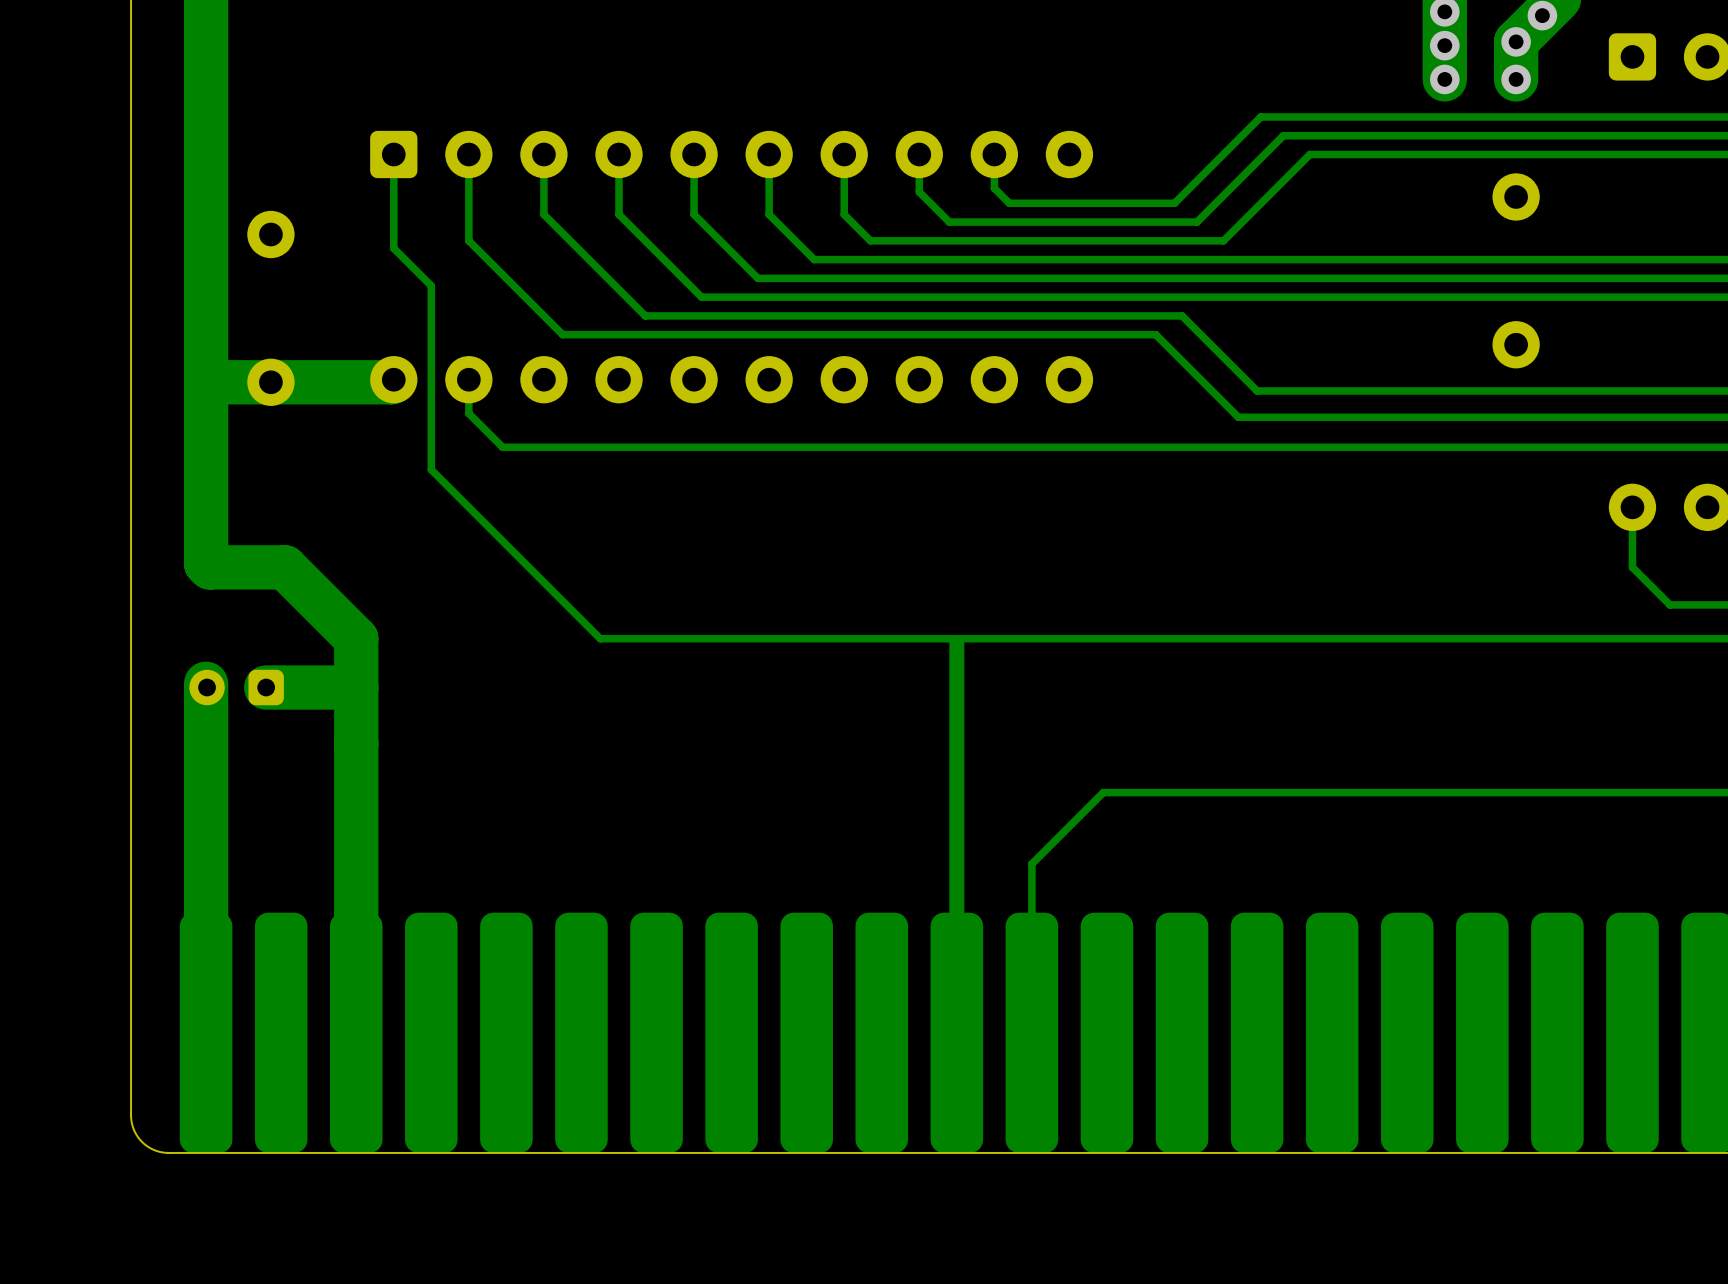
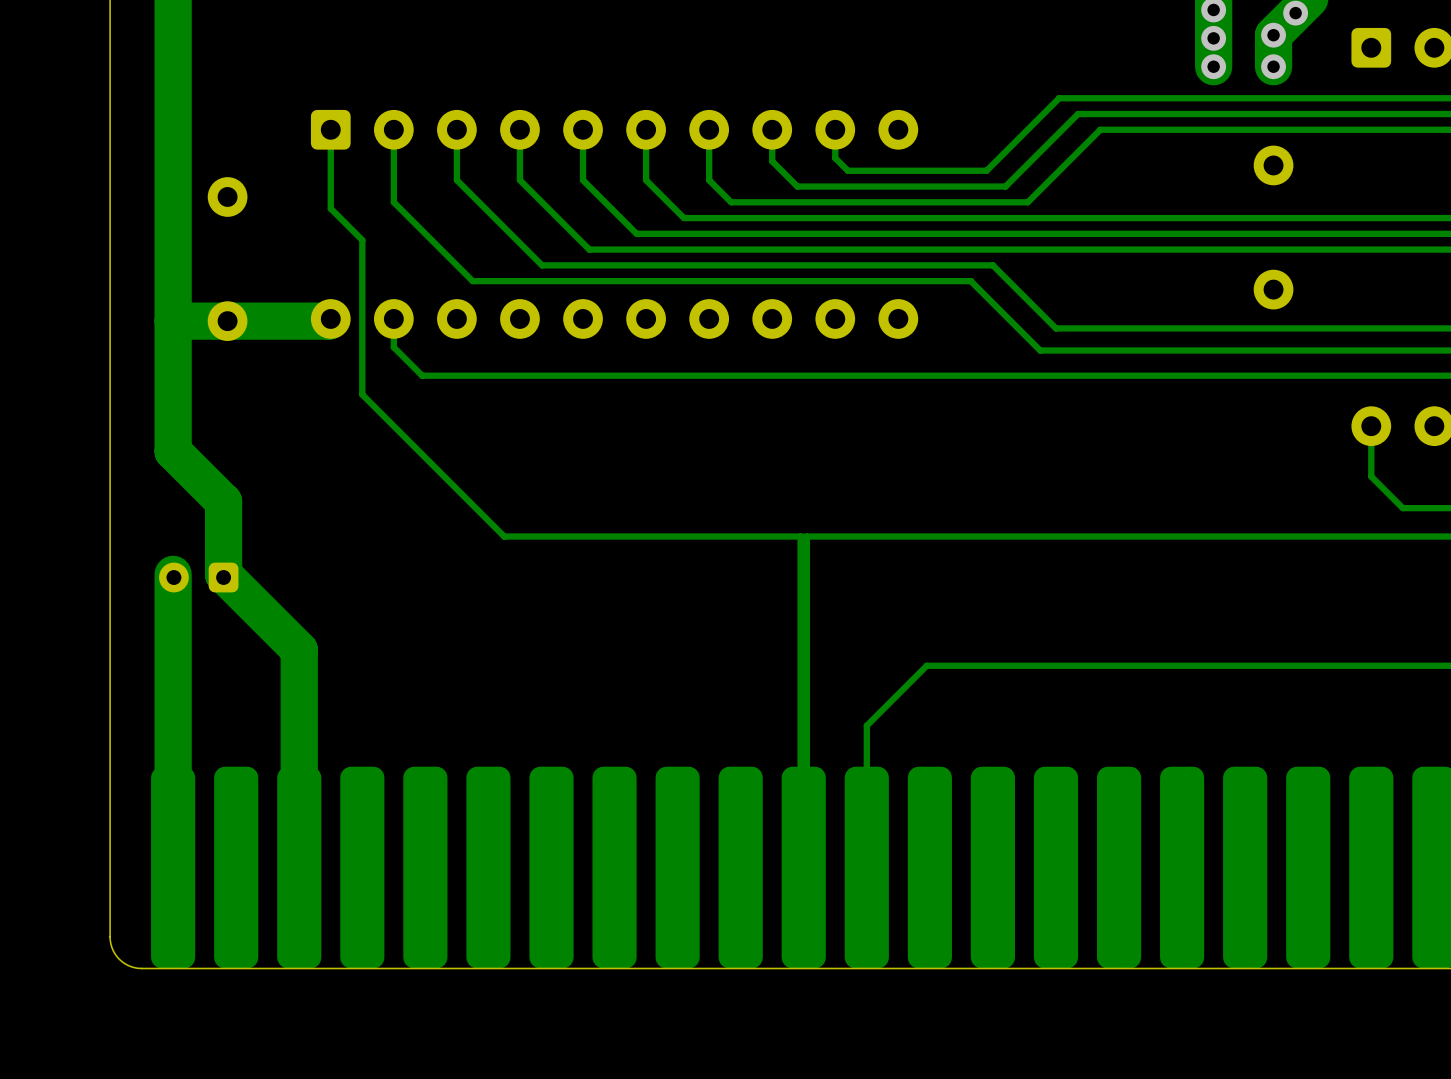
track: (206, 537) (206, 563) (209, 567) (284, 567) (356, 638) (356, 773) -> (173, 451) (223, 501) (223, 574) (299, 650)
track: (356, 687) (266, 687) -> none

